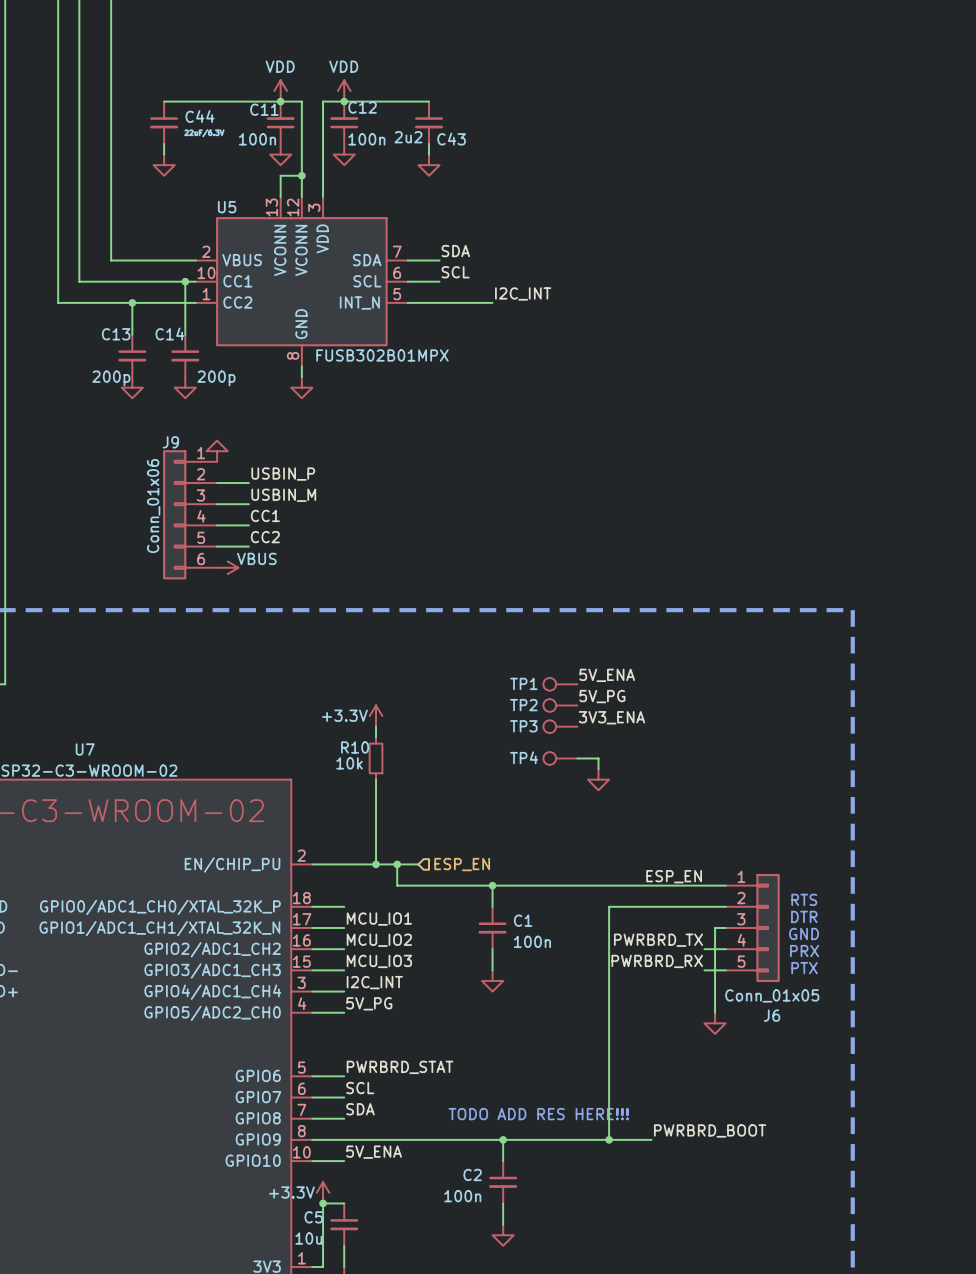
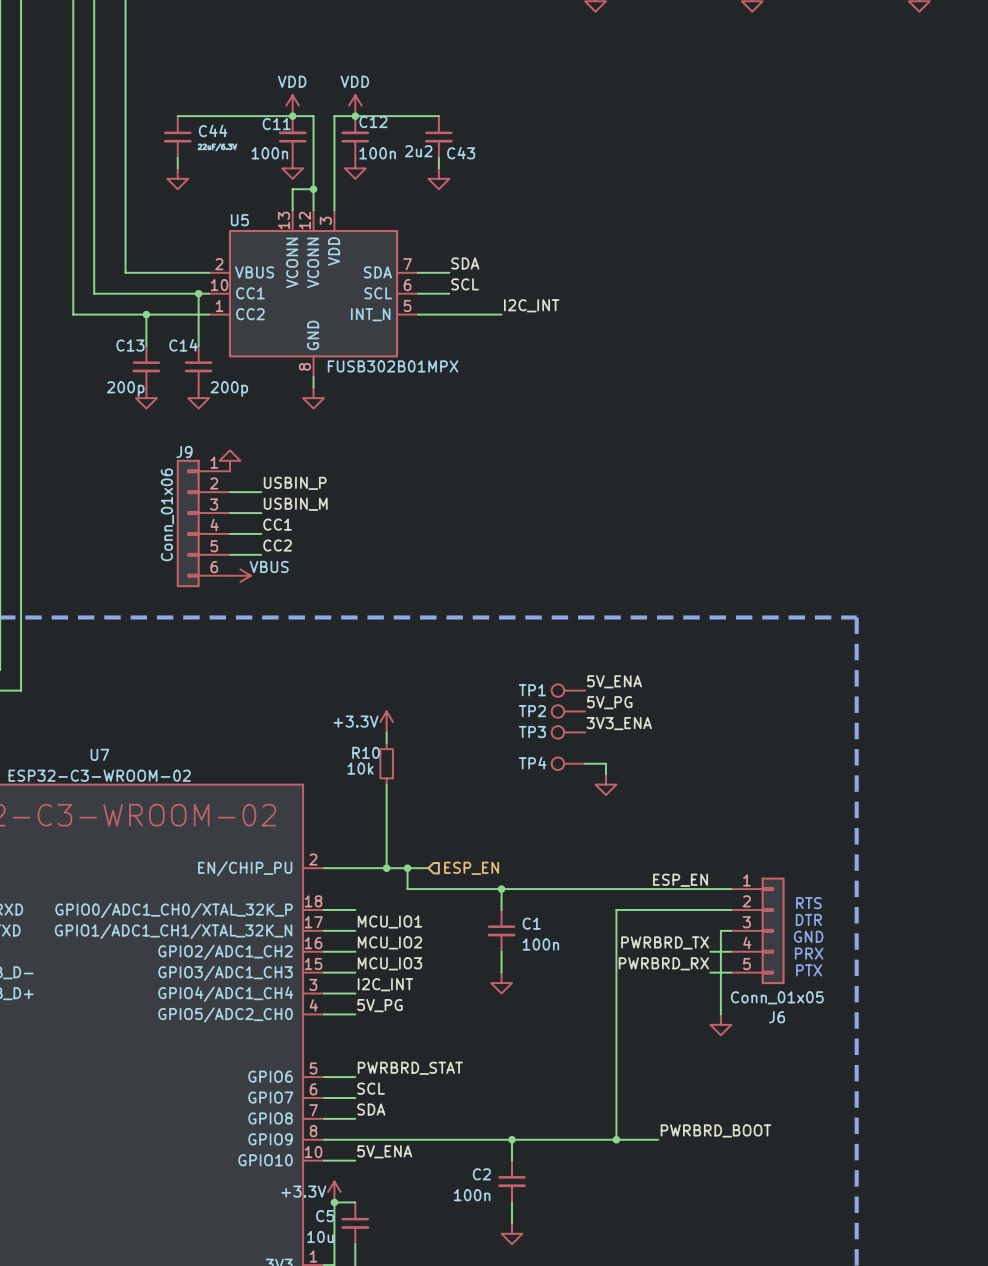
text: TODO ADD RES HERE!!! (538, 1114) -> none

